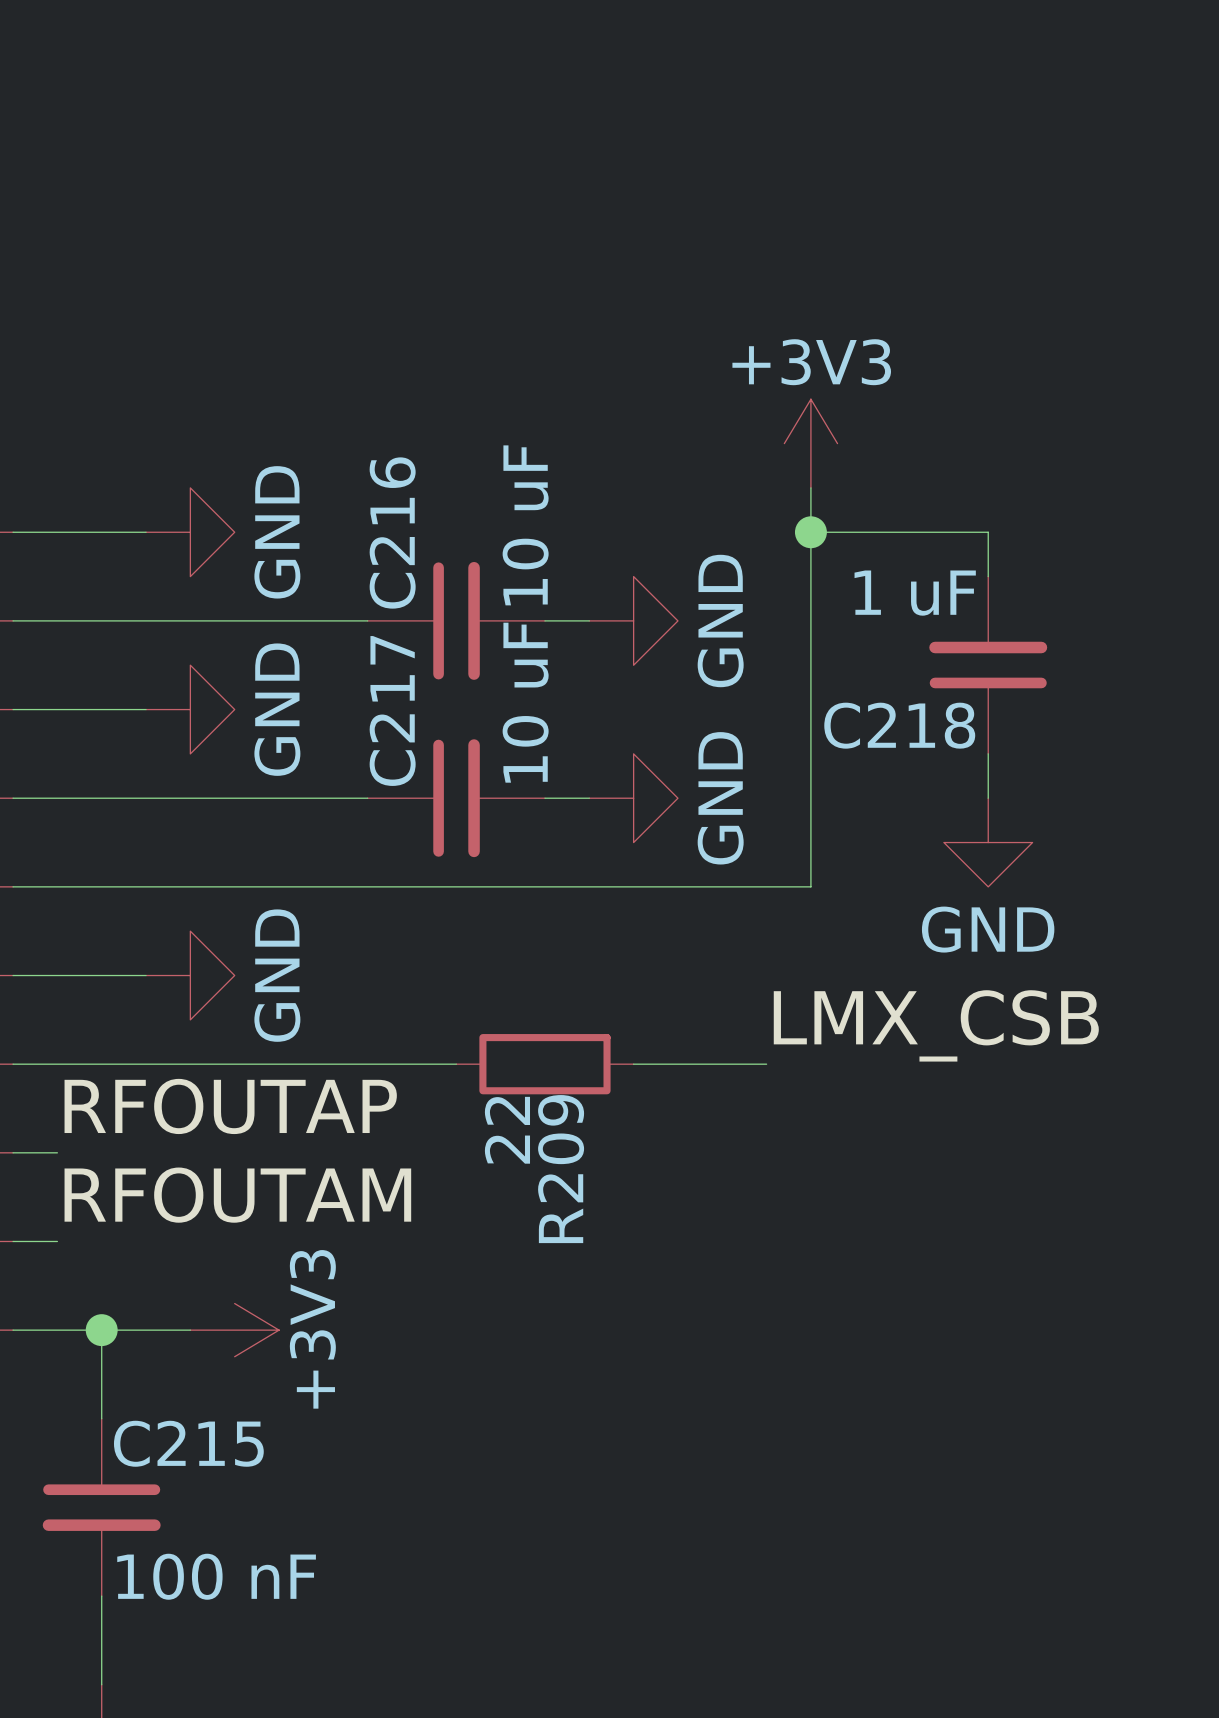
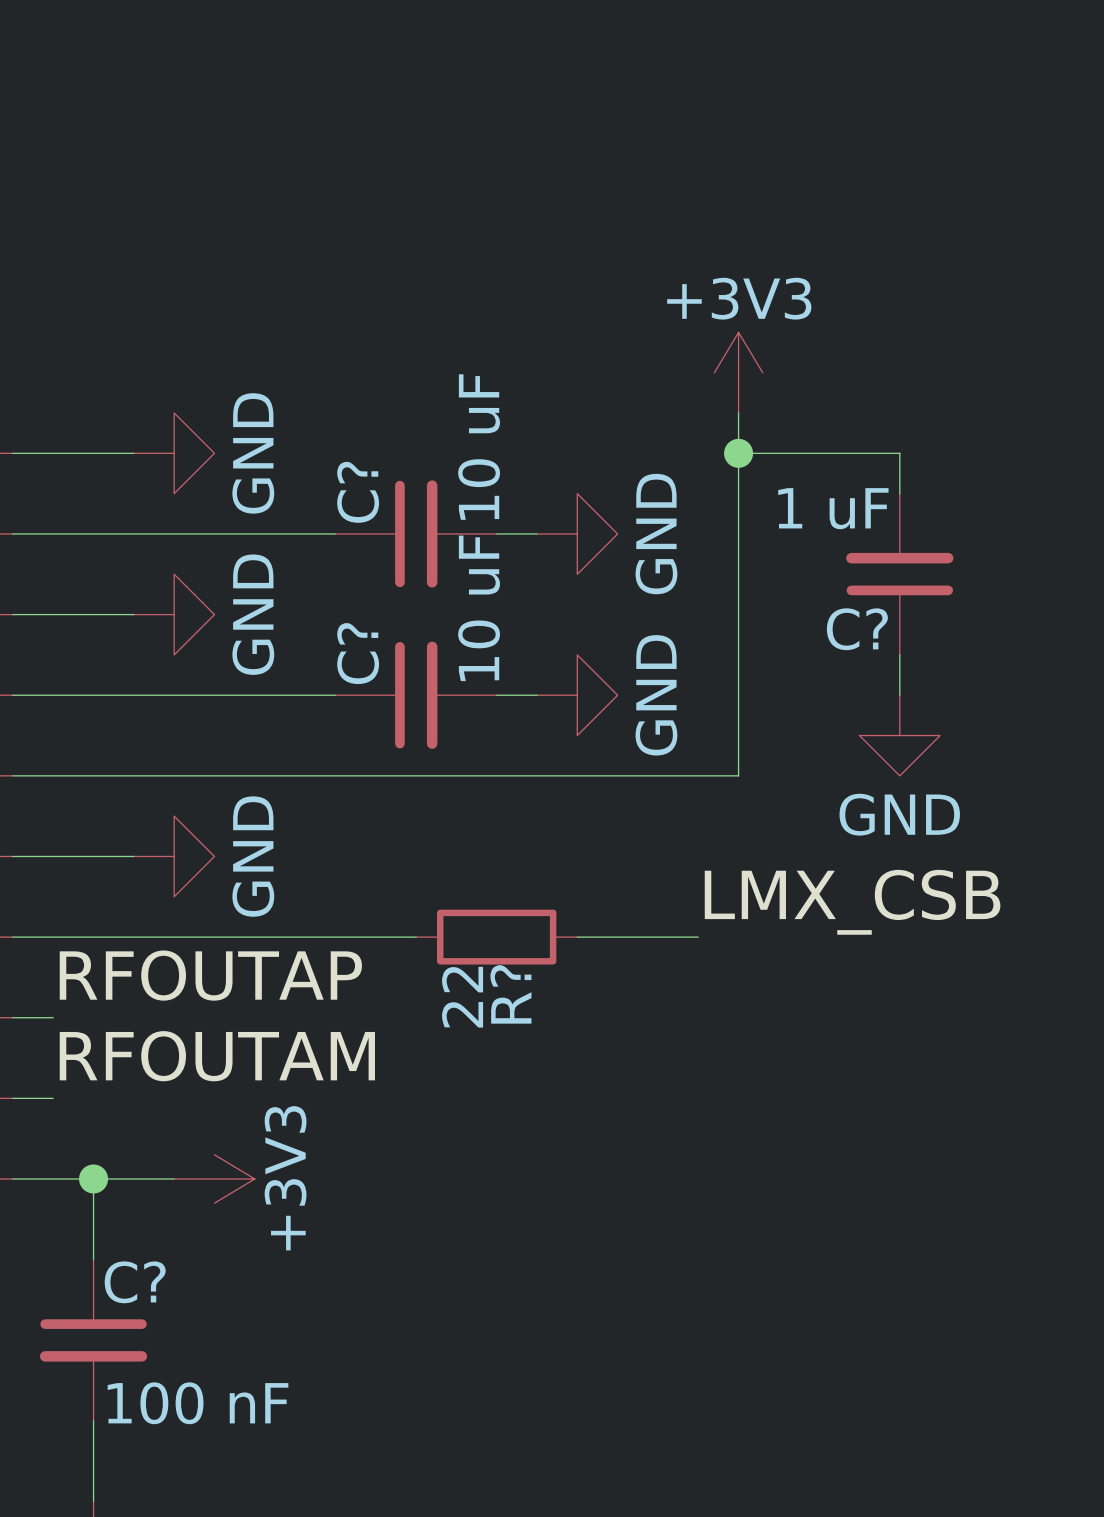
C216 name: C216 (392, 533) -> C? (358, 492)
C217 name: C217 (392, 710) -> C? (358, 653)
C218 name: C218 (899, 725) -> C? (857, 629)
R209 name: R209 (561, 1169) -> R? (510, 994)
C215 name: C215 (188, 1443) -> C? (135, 1282)

